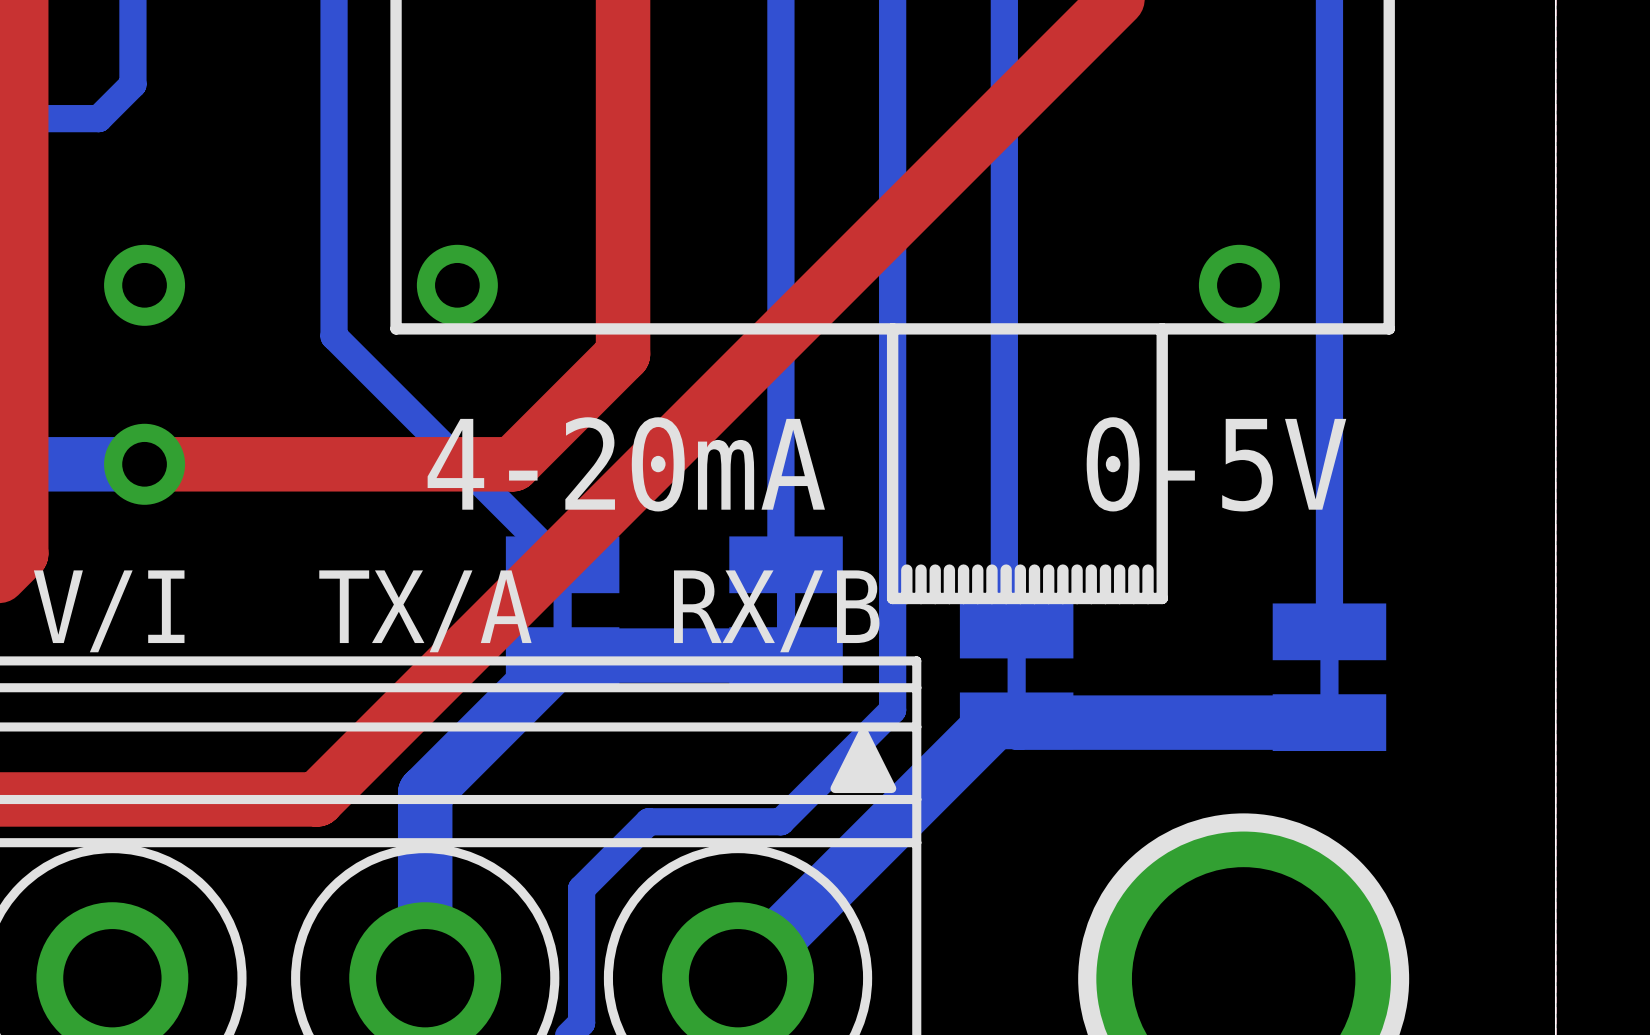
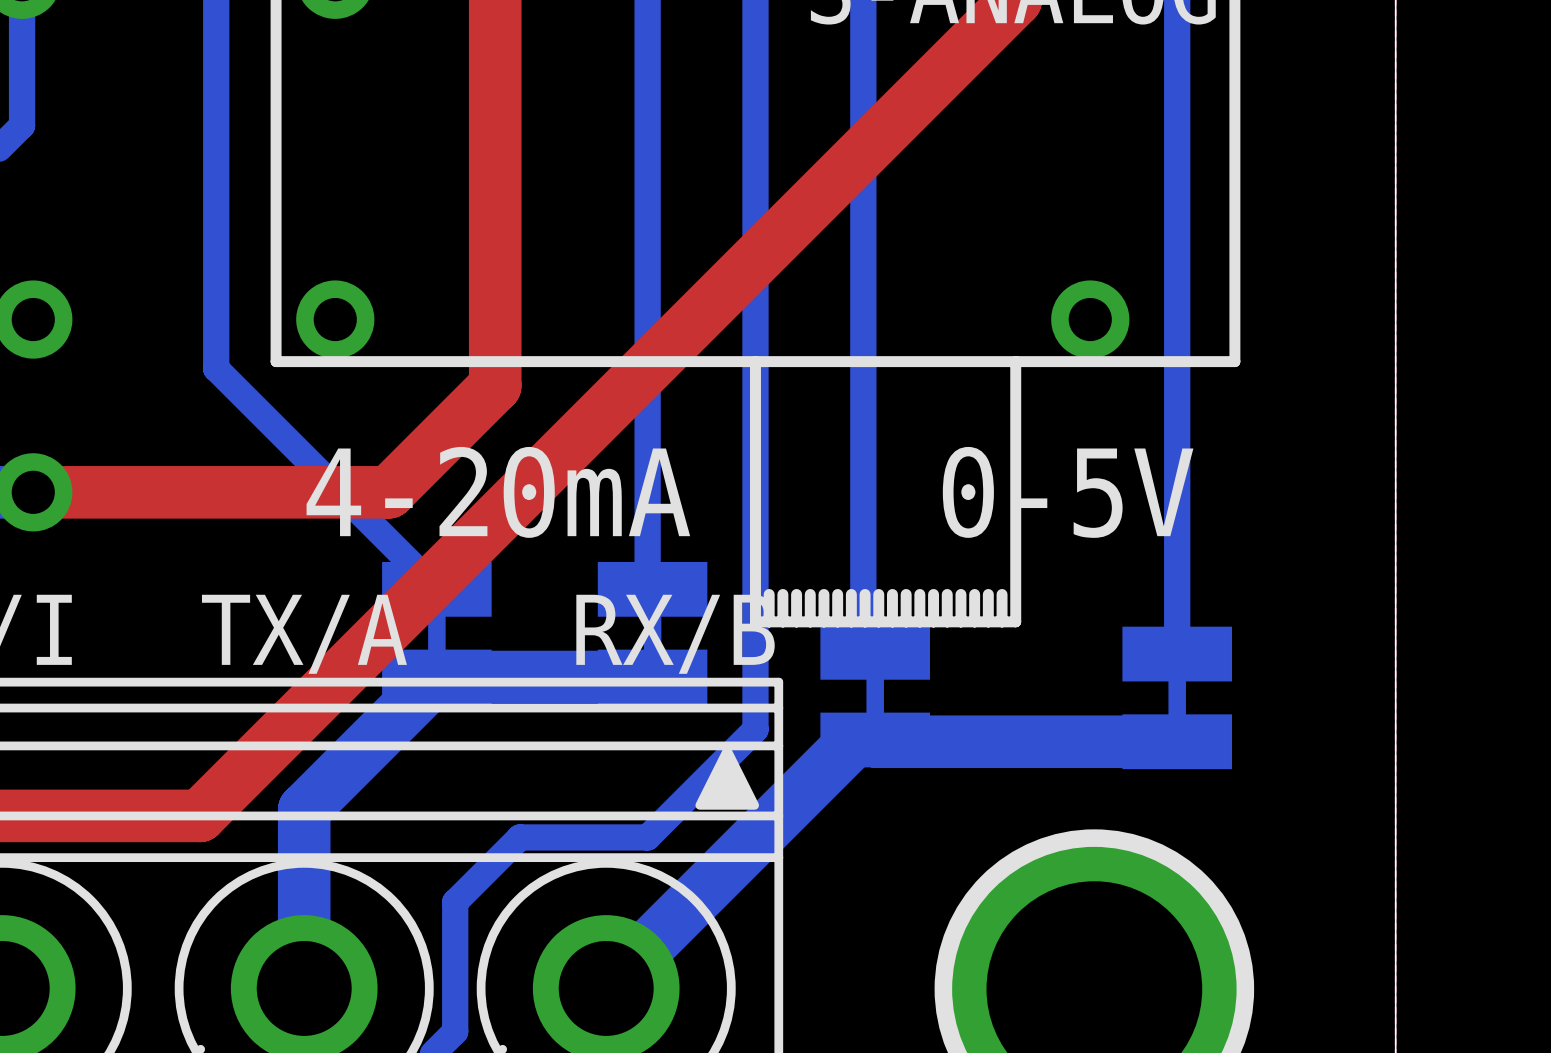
text position: RX/B (776, 611) -> RX/B (675, 634)

